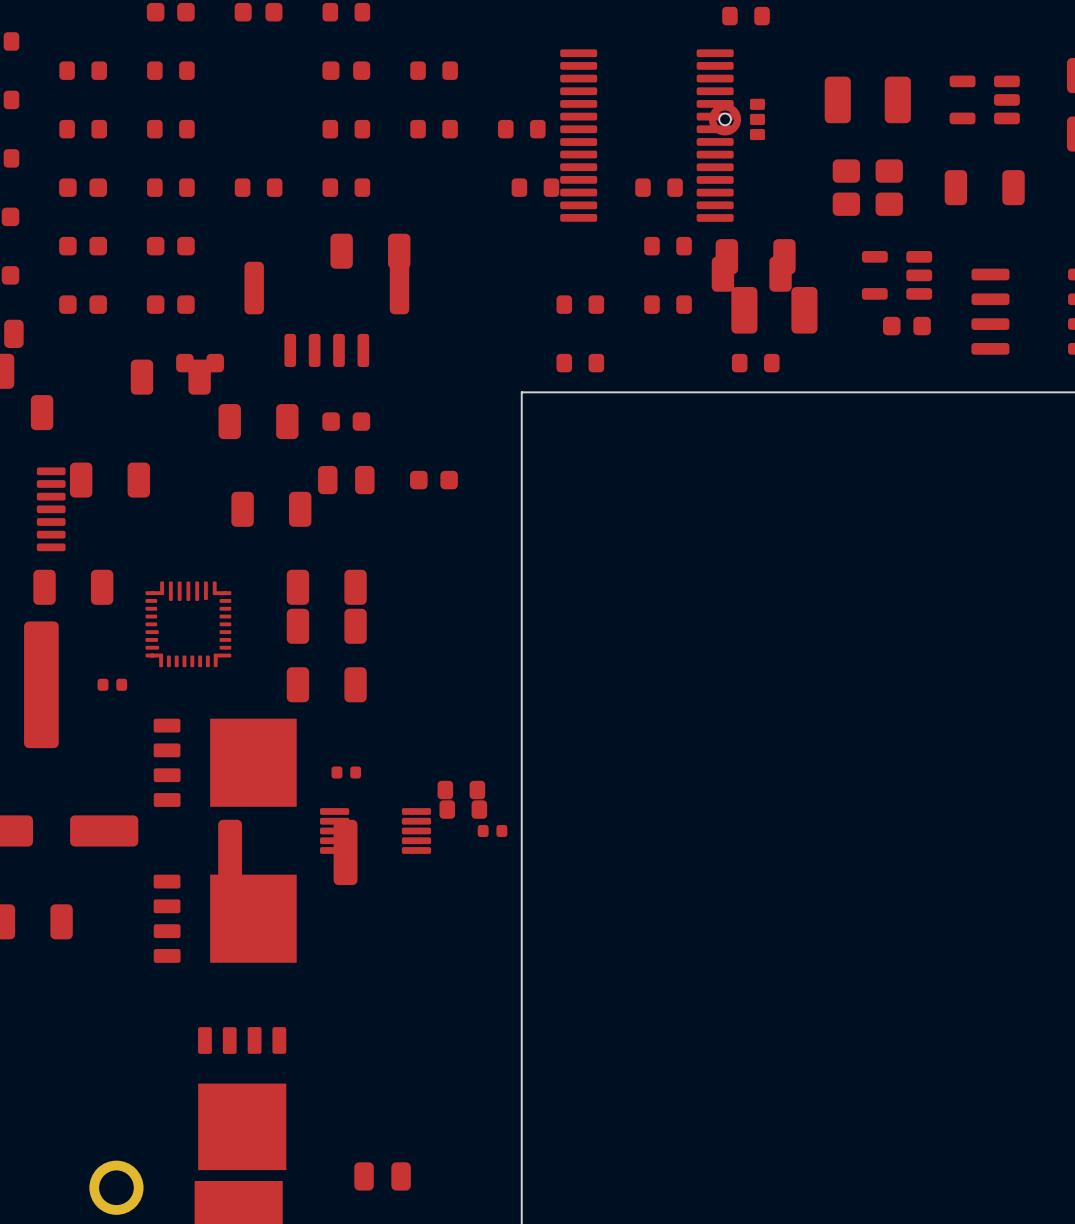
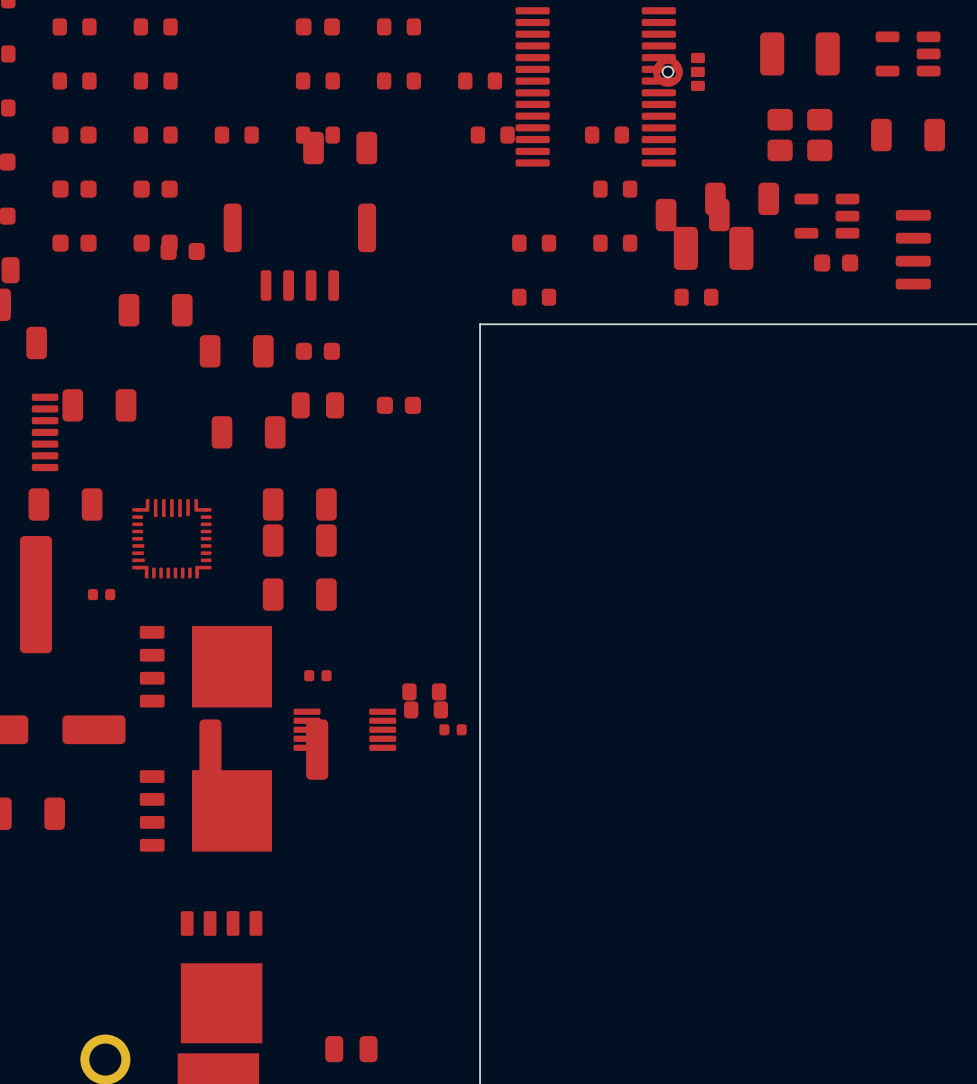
part position: (370, 251) -> (340, 148)
part position: (755, 256) -> (742, 198)
part position: (200, 363) -> (182, 251)

